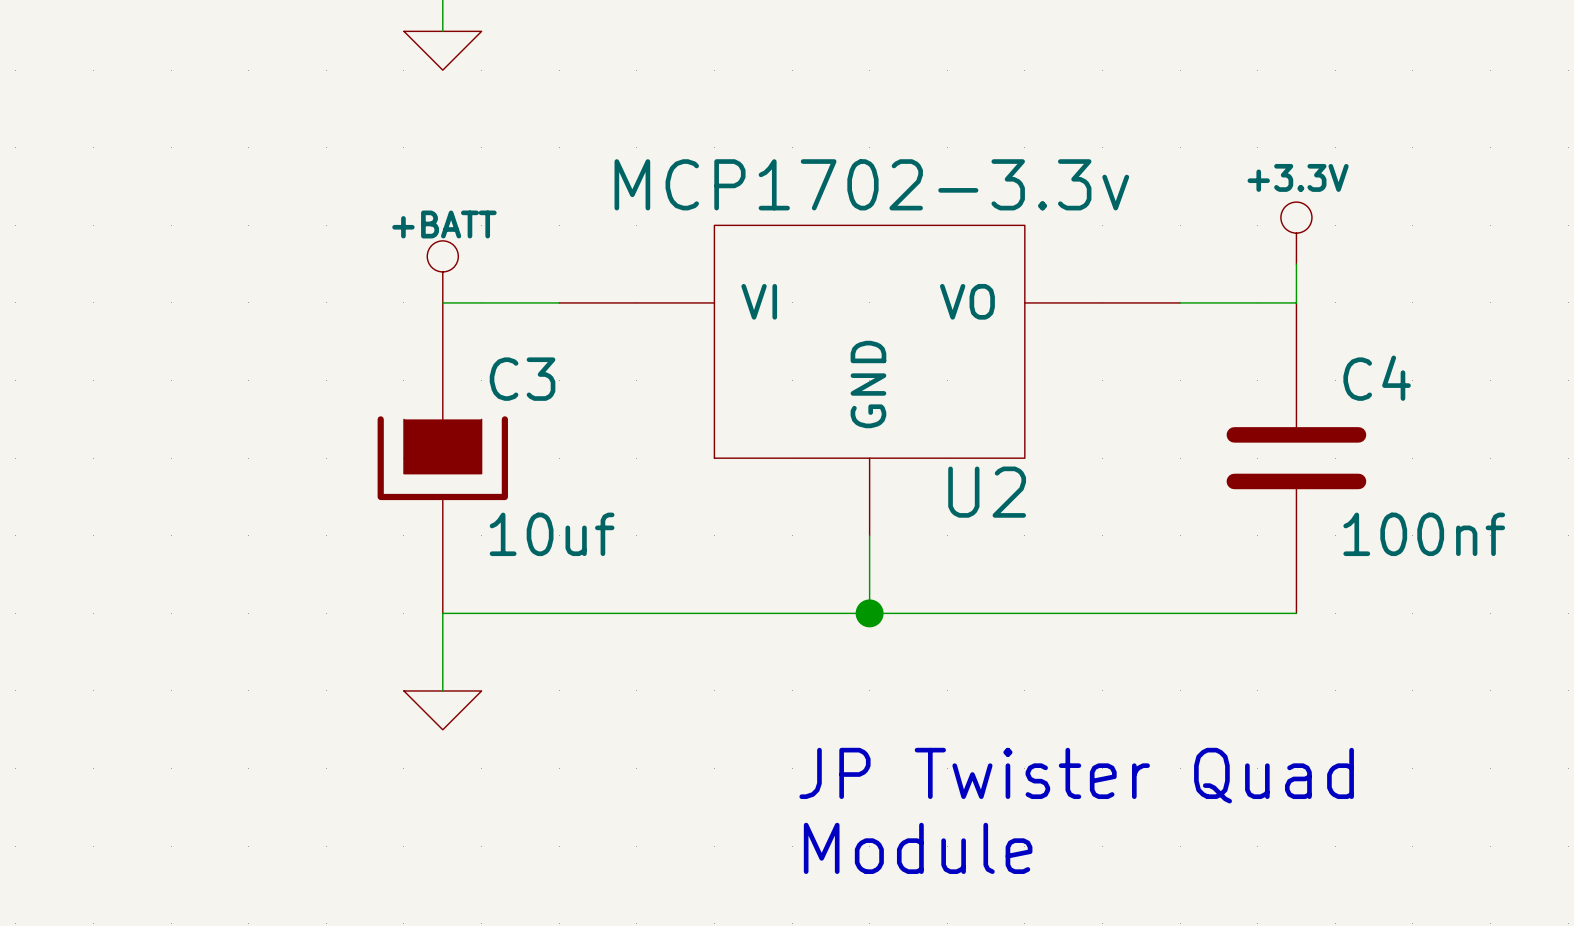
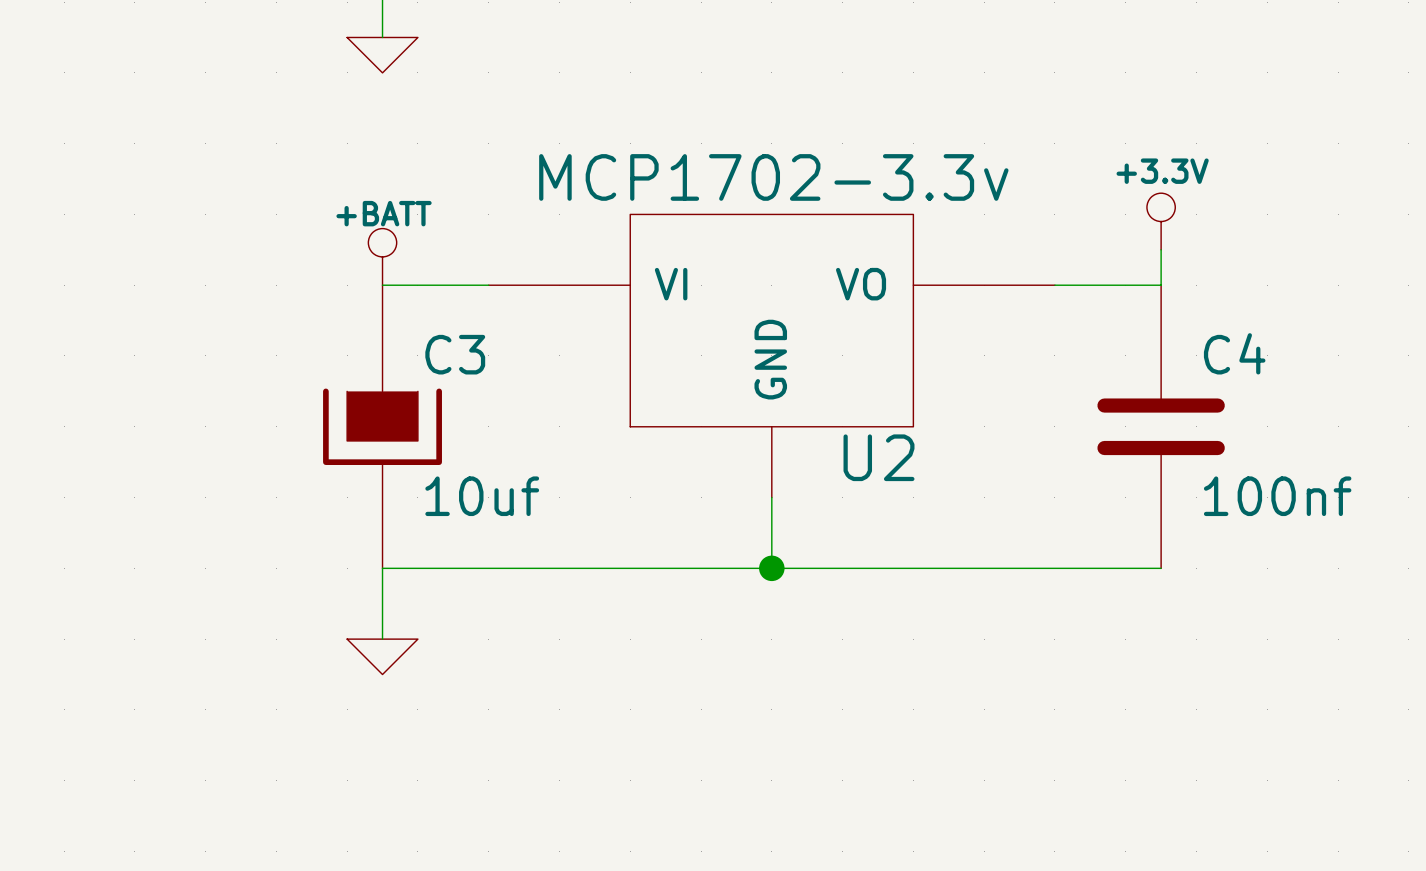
text: JP Twister Quad (1076, 775) -> none
text: Module (918, 848) -> none

